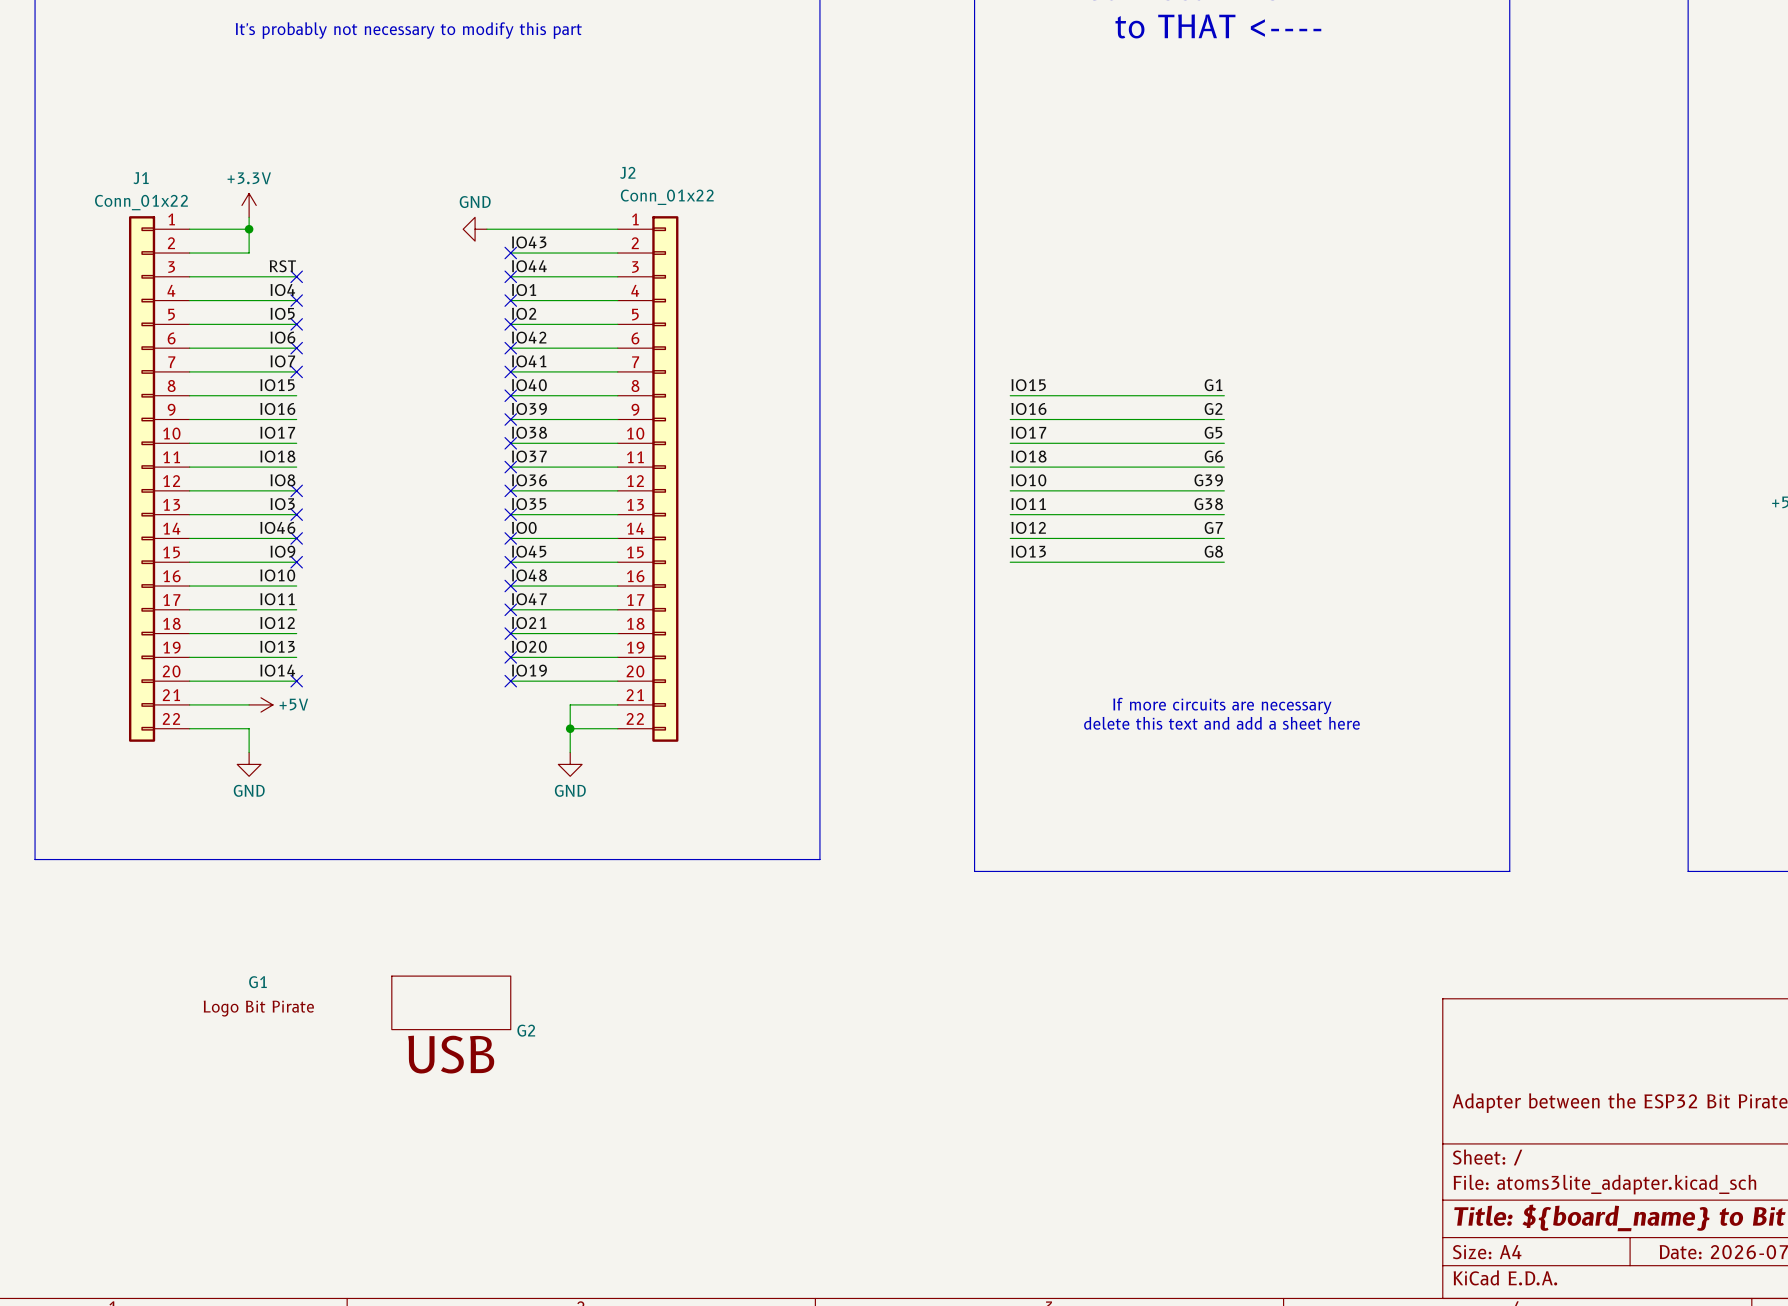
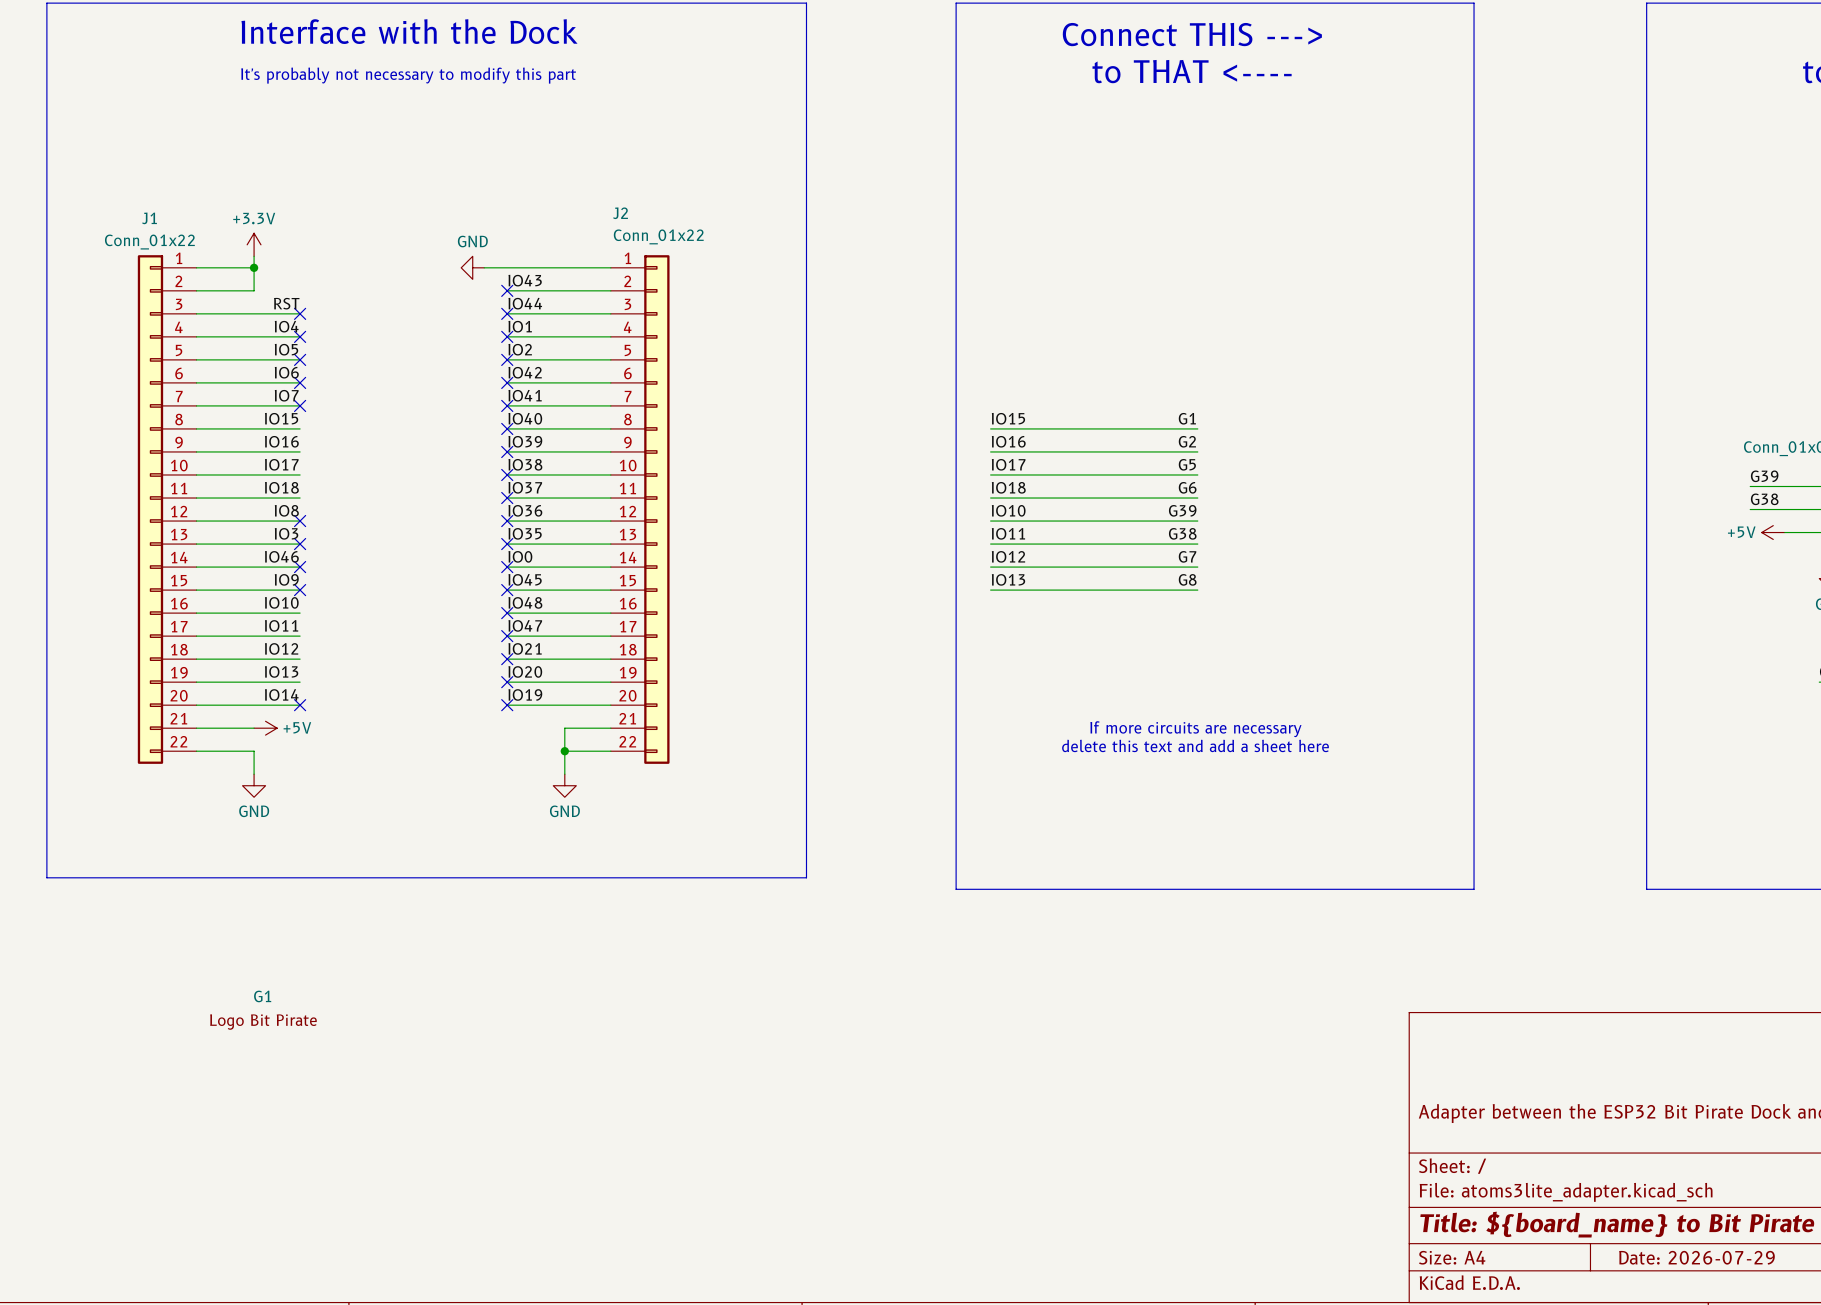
G2: (451, 1002) -> none

